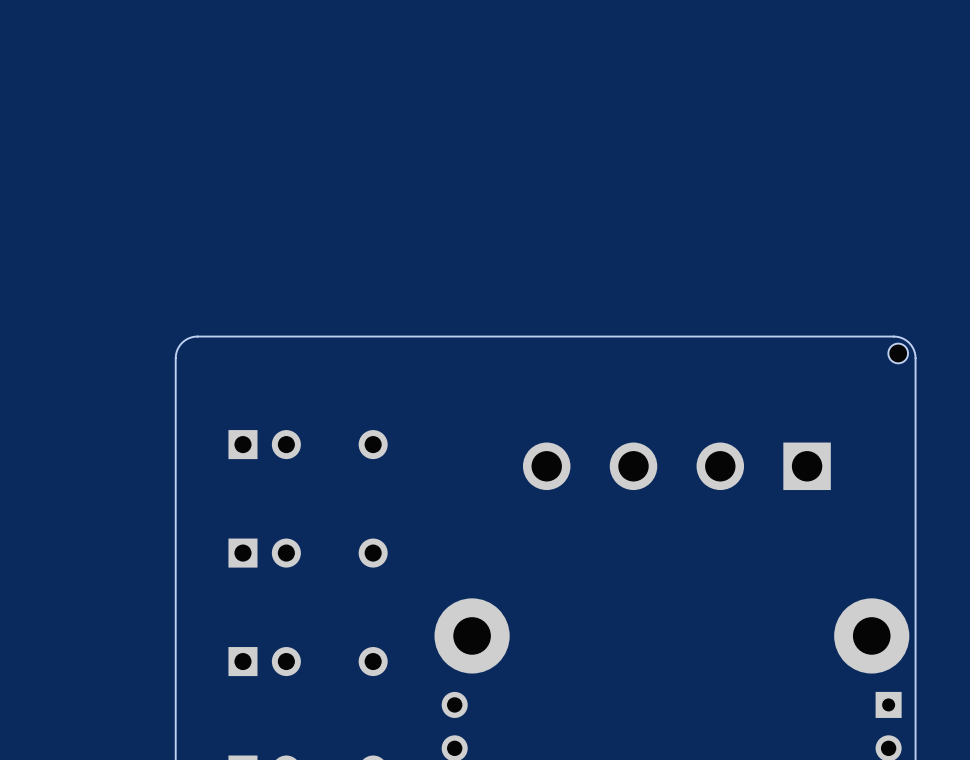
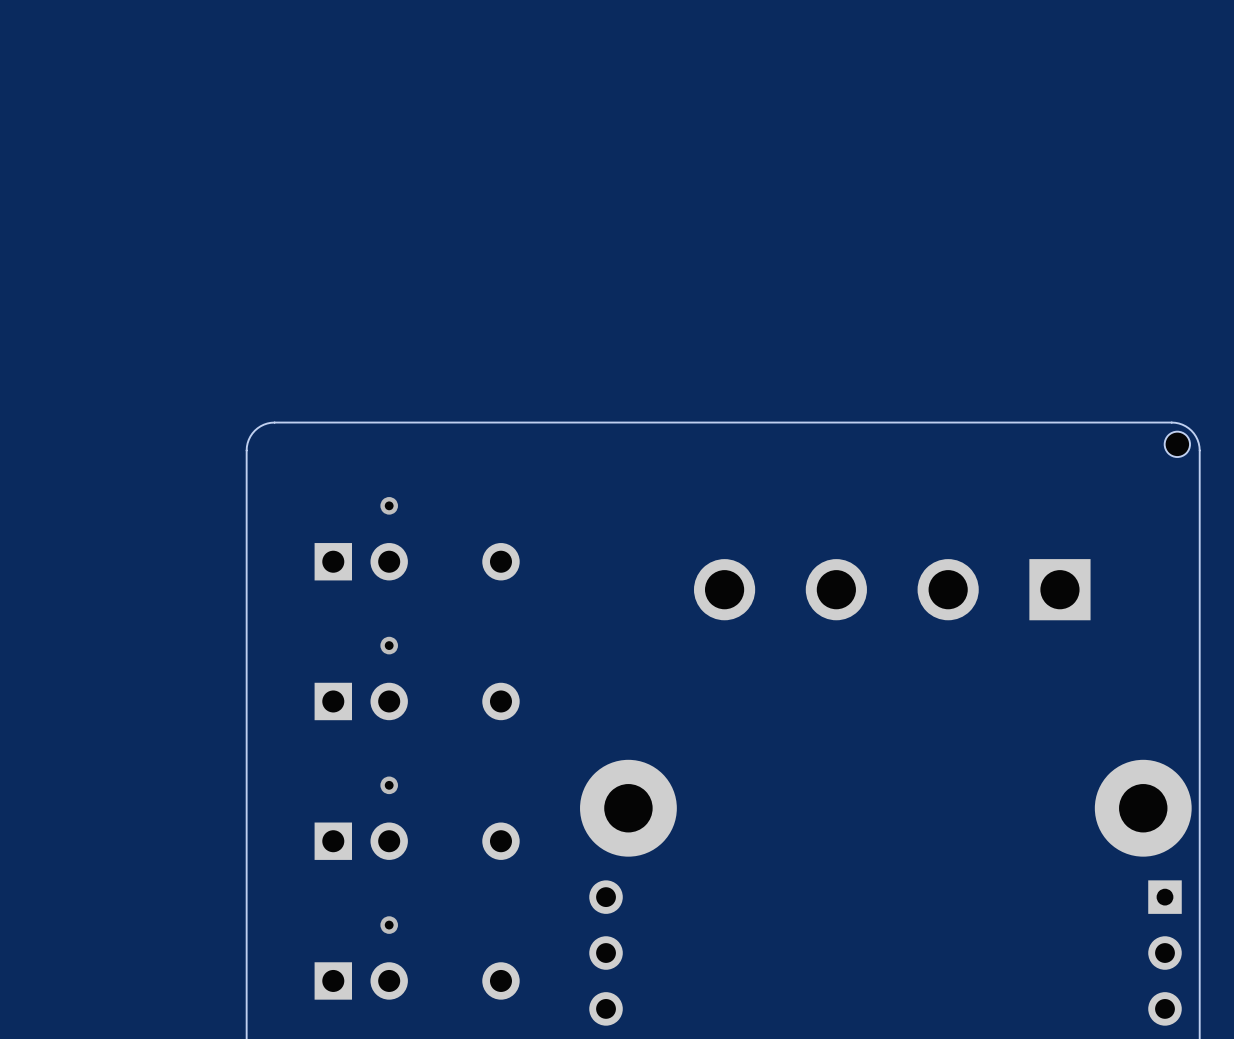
via: none -> (389, 505)
via: none -> (389, 645)
via: none -> (389, 785)
via: none -> (389, 925)

